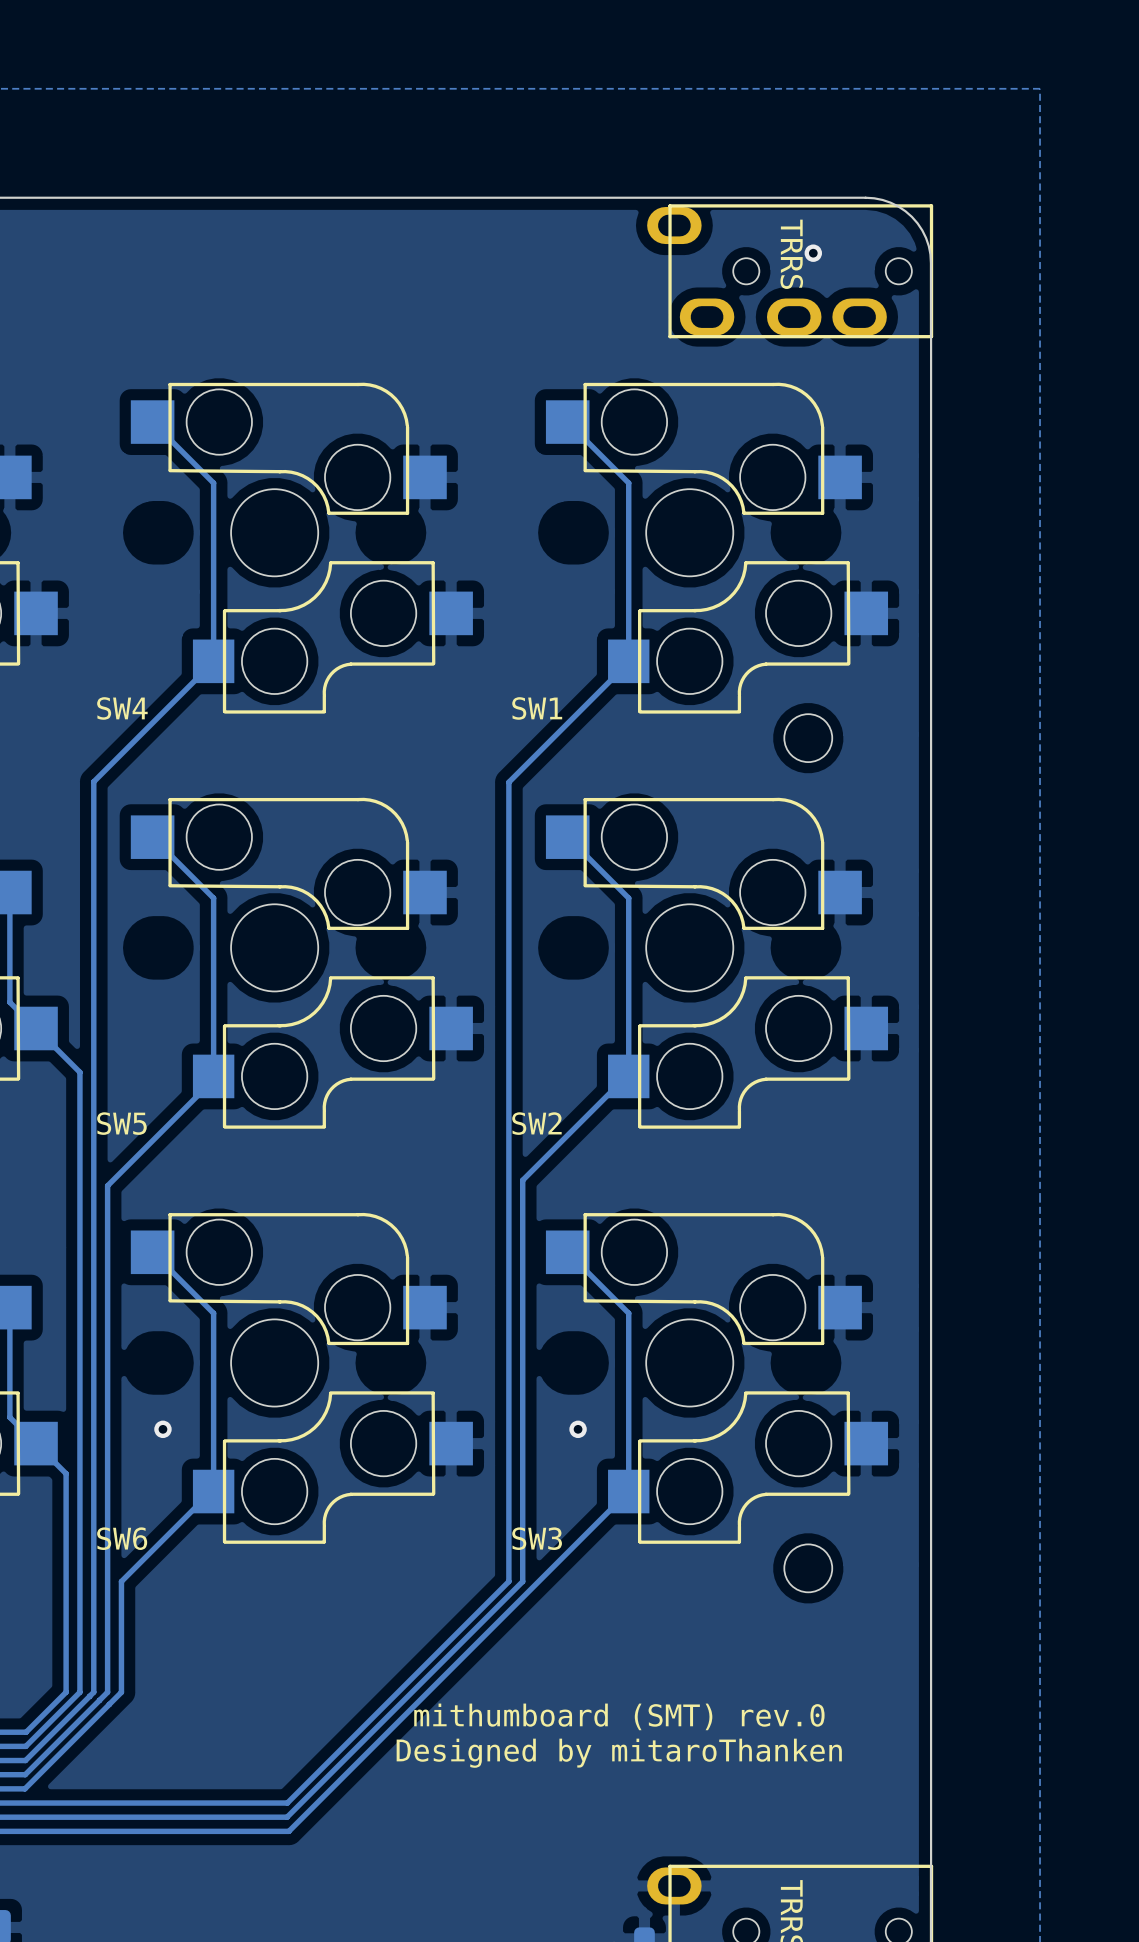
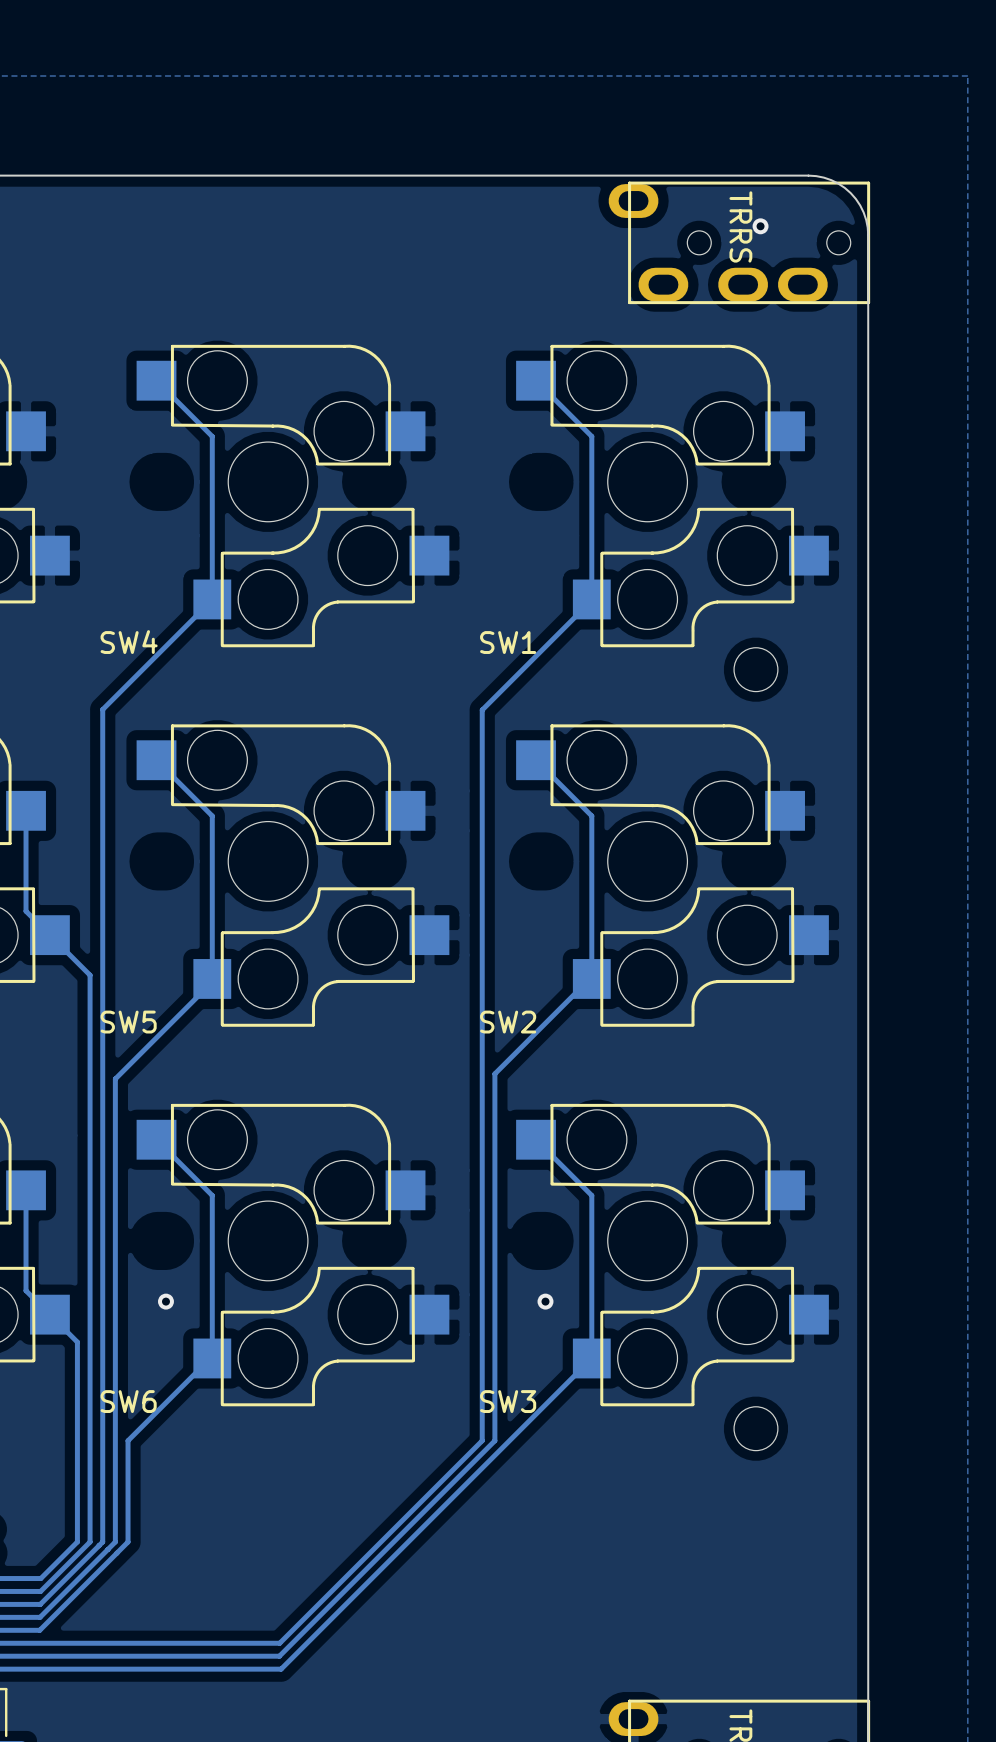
text: mithumboard (SMT) rev.0 (619, 1716) -> none
text: Designed by mitaroThanken (619, 1753) -> none

